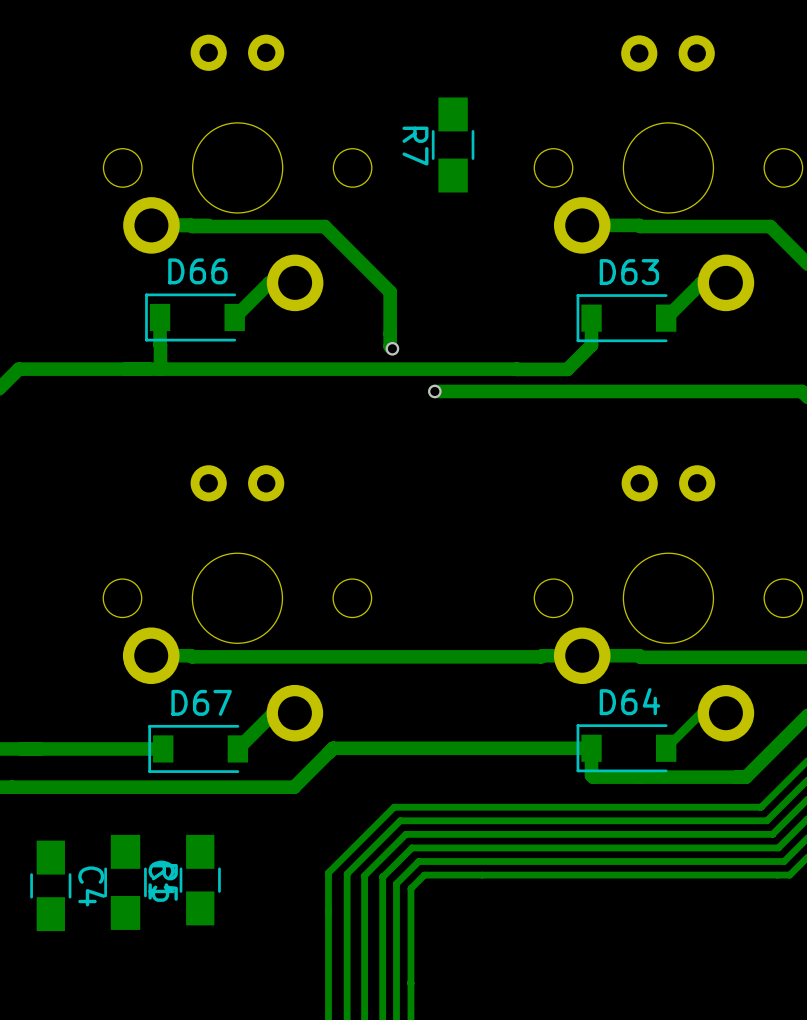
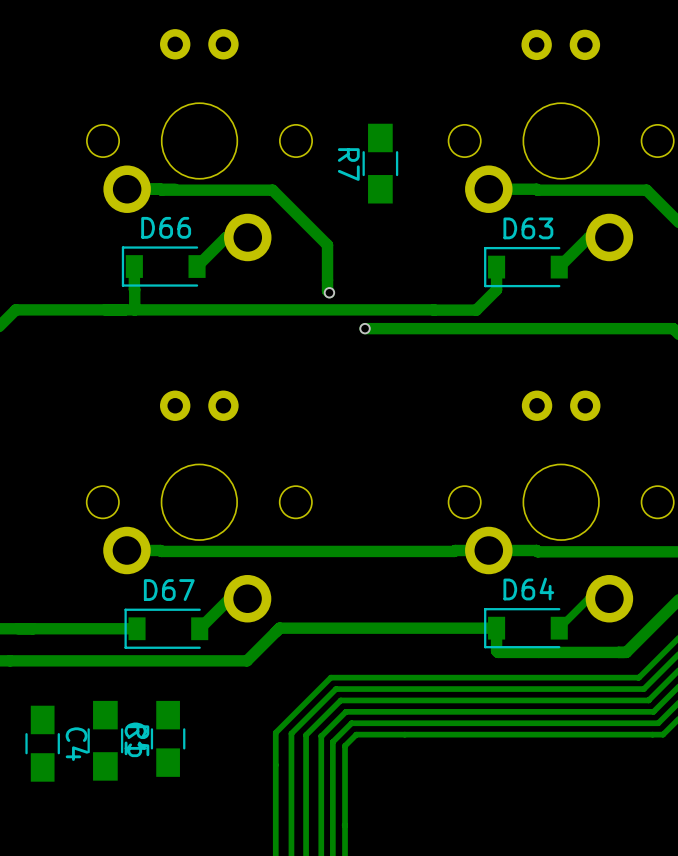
R7 position: (453, 144) -> (380, 163)

